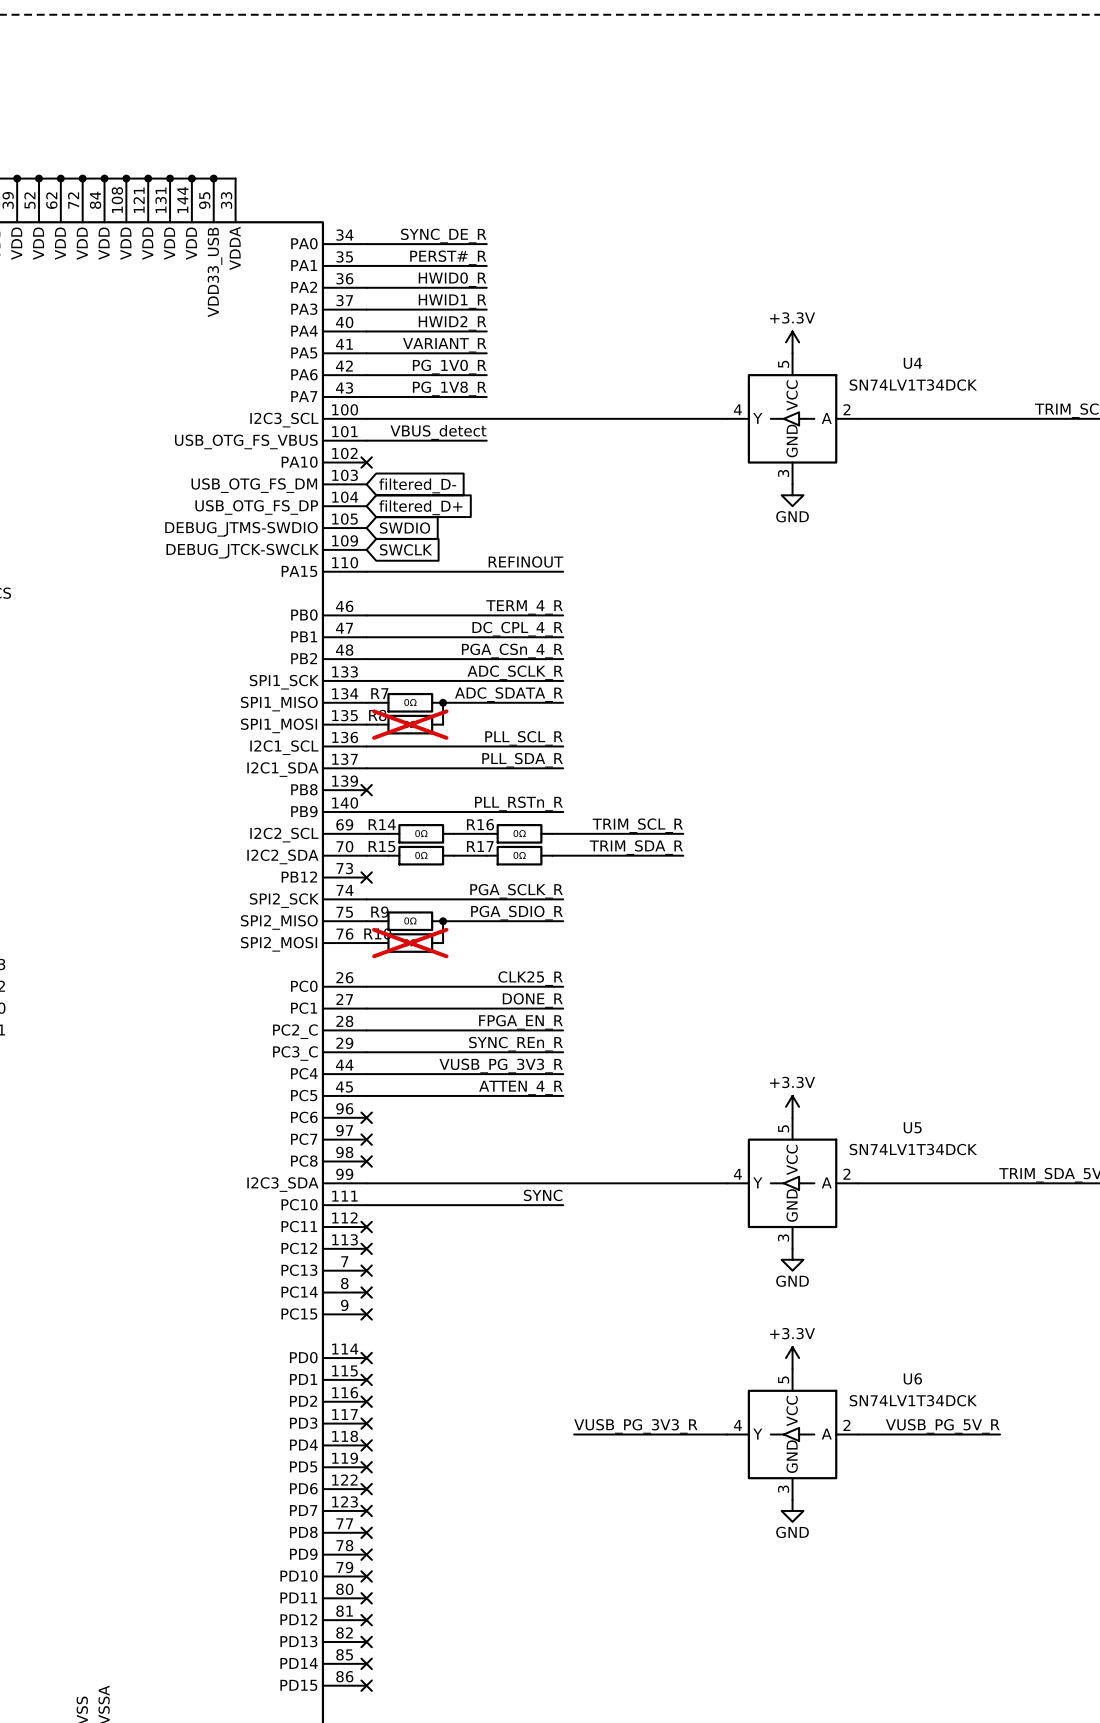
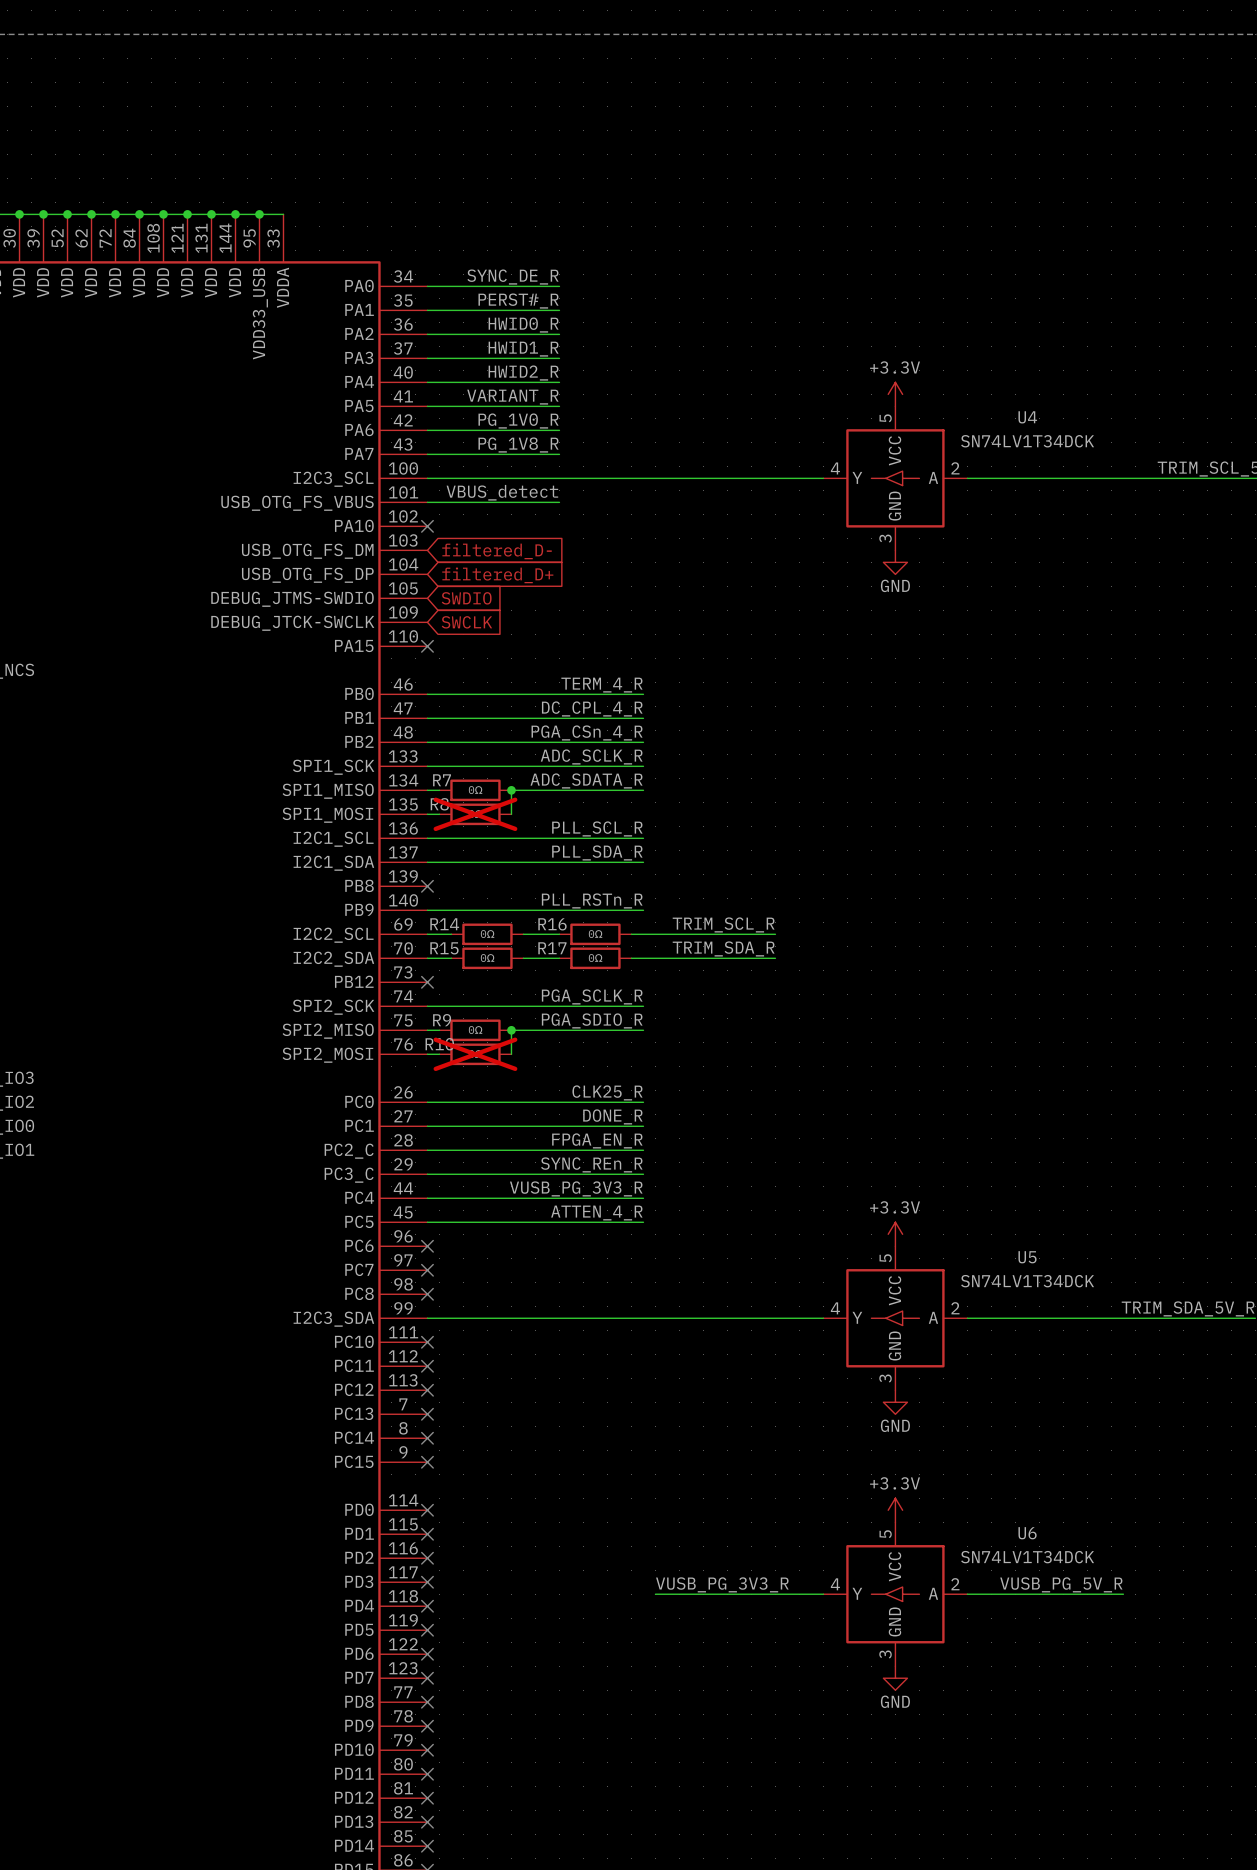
label: REFINOUT (525, 561) -> none
wire: (366, 571) (563, 571) -> none
no-connect mark: none -> (427, 646)
label: SYNC (543, 1195) -> none
wire: (366, 1205) (563, 1205) -> none
no-connect mark: none -> (427, 1342)

